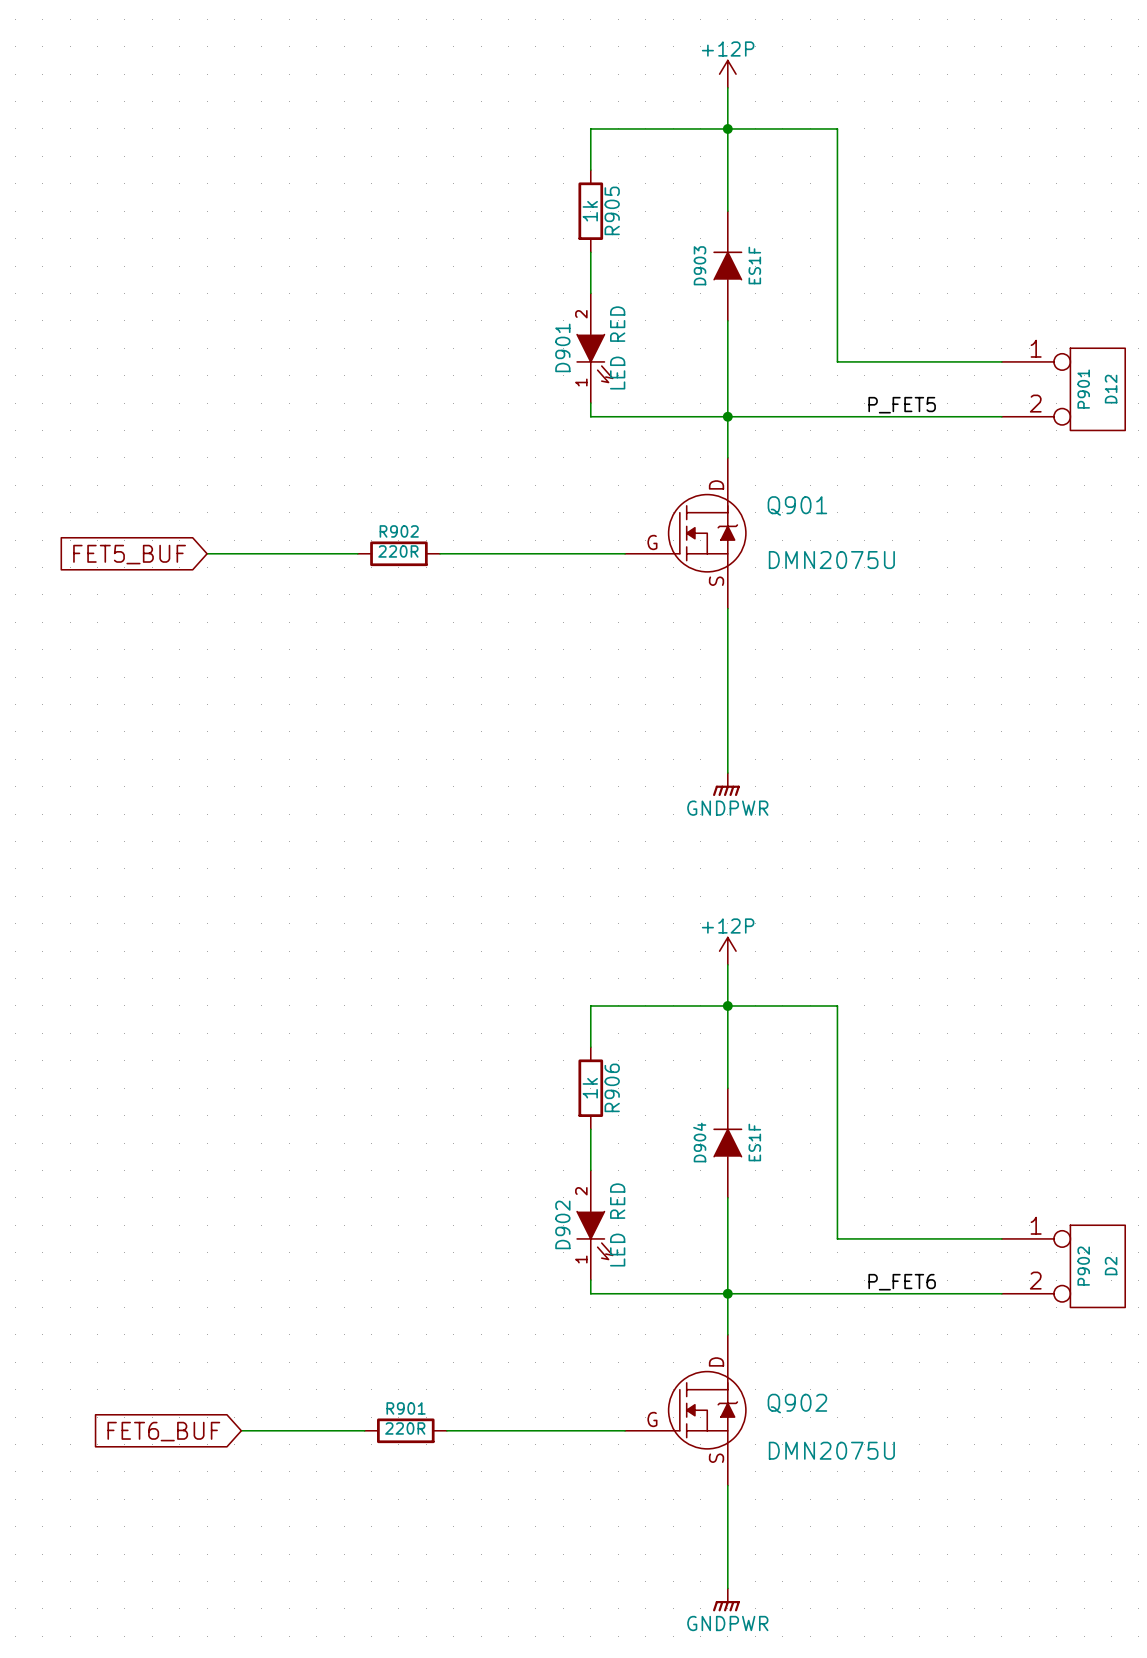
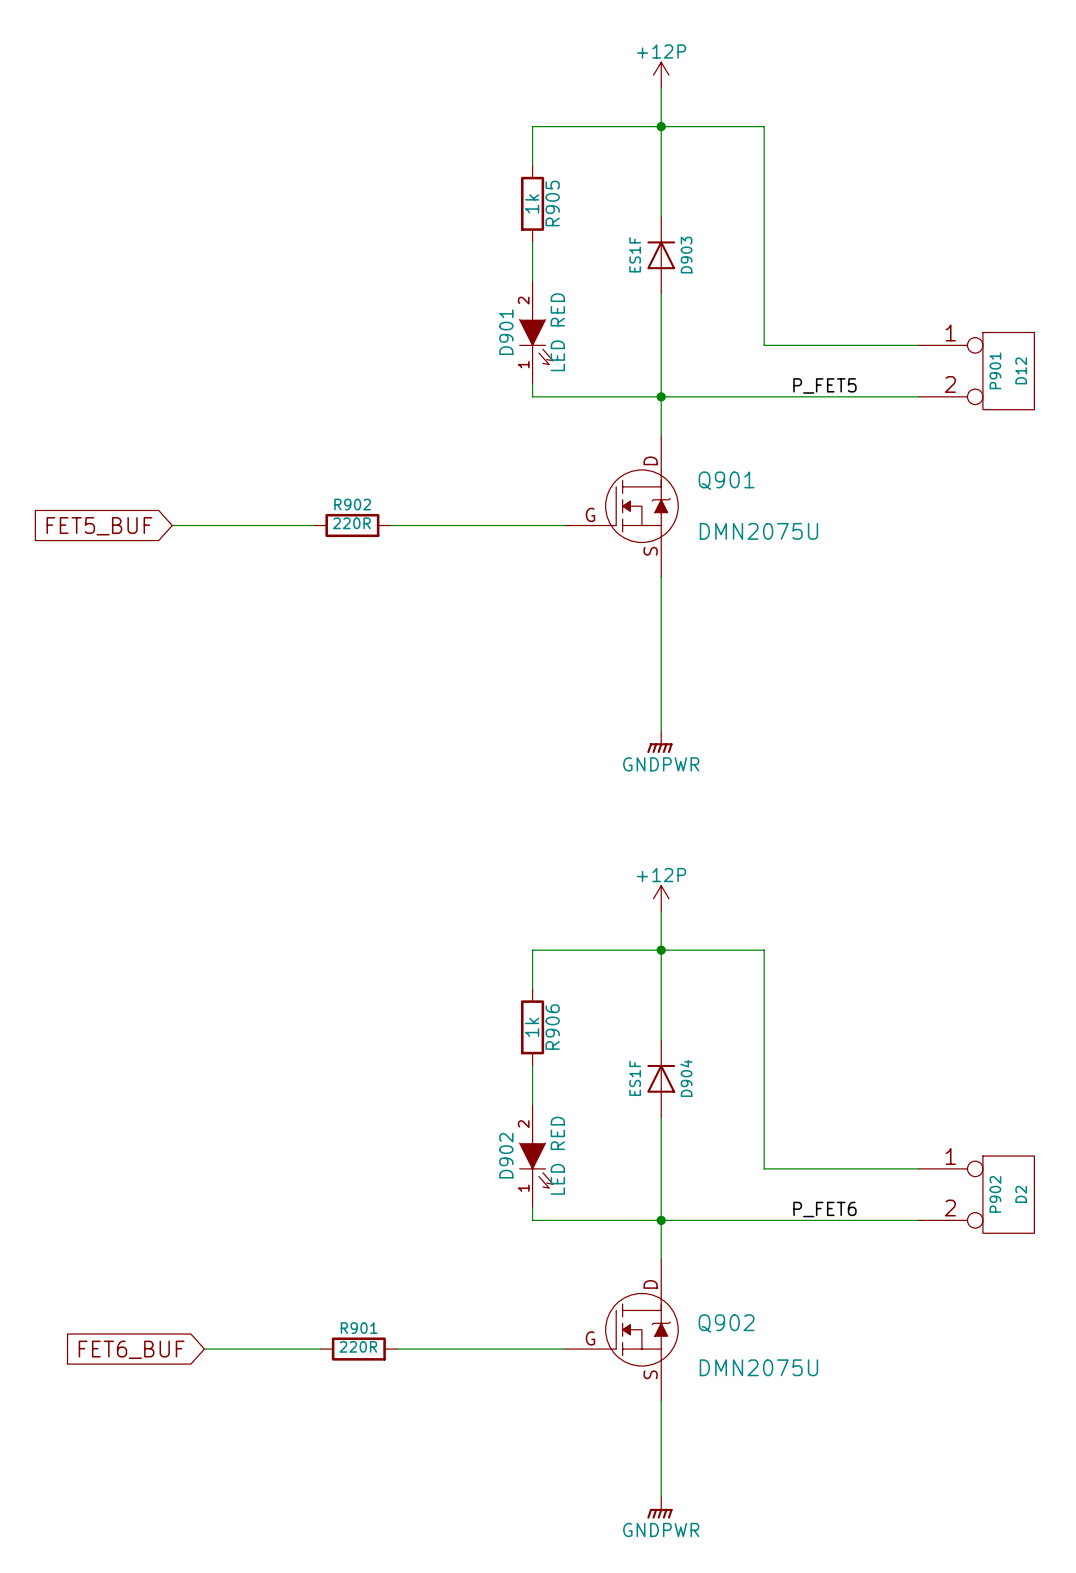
D903 symbol: [713, 211, 743, 321] -> [647, 216, 676, 294]
D903 name position: D903 (700, 265) -> D903 (686, 255)
D903 value position: ES1F (754, 265) -> ES1F (635, 254)
D904 symbol: [713, 1088, 743, 1198] -> [647, 1040, 676, 1118]
D904 name position: D904 (699, 1142) -> D904 (686, 1078)
D904 value position: ES1F (754, 1142) -> ES1F (635, 1078)

